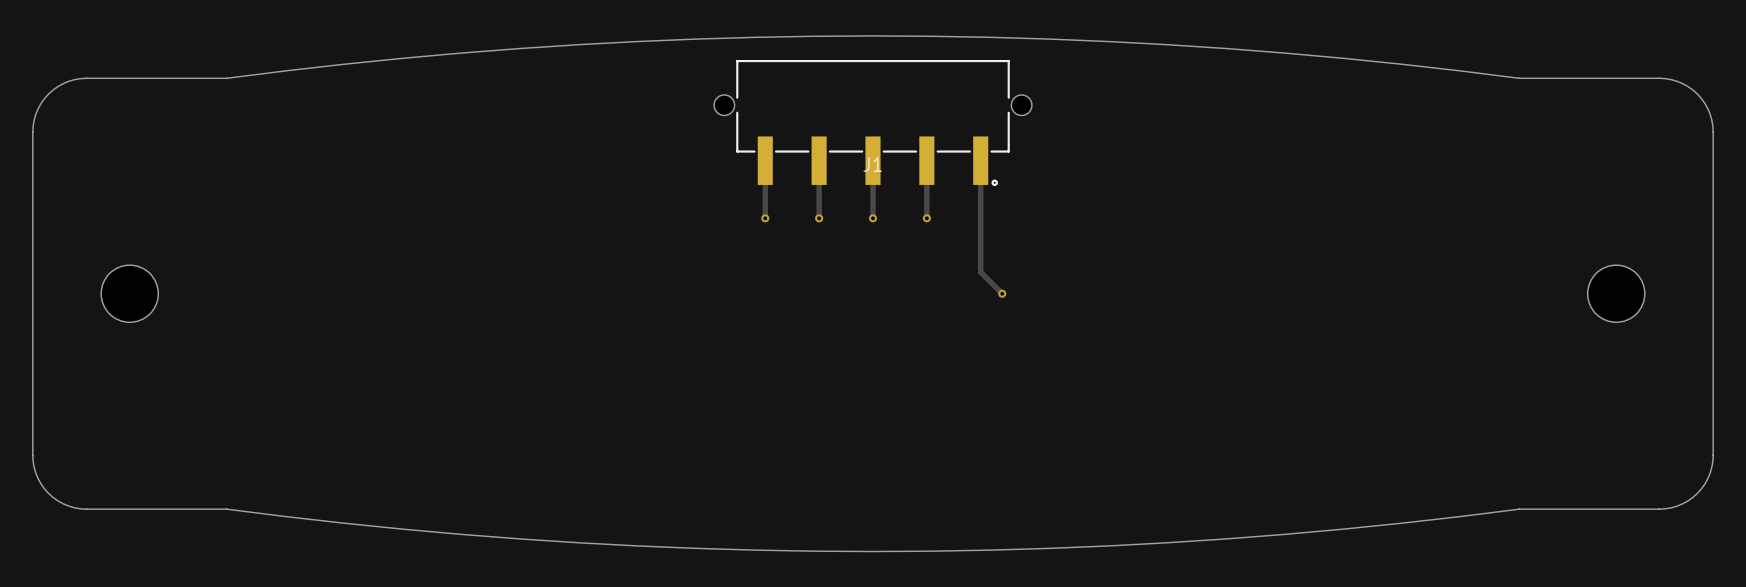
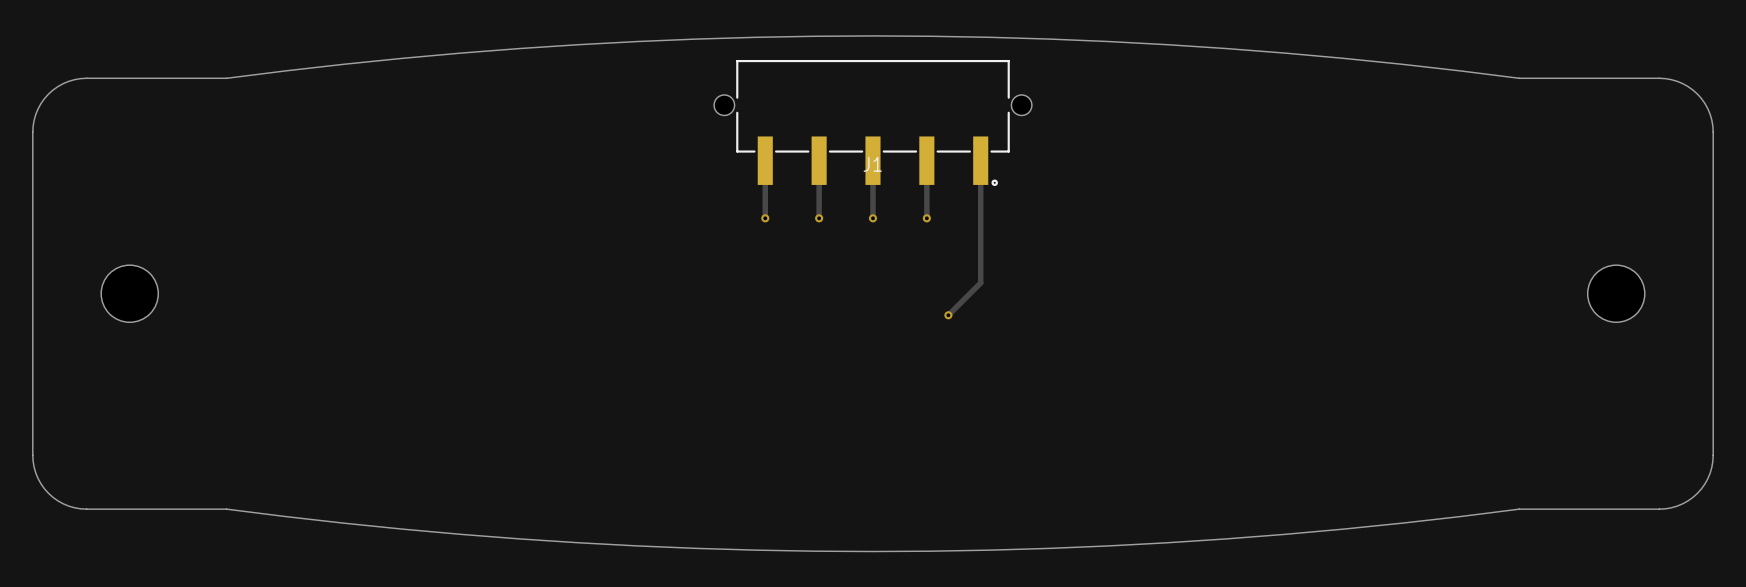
track: (980, 272) (1002, 293) -> (980, 272) (980, 282) (948, 315)
via position: (1002, 293) -> (948, 315)

